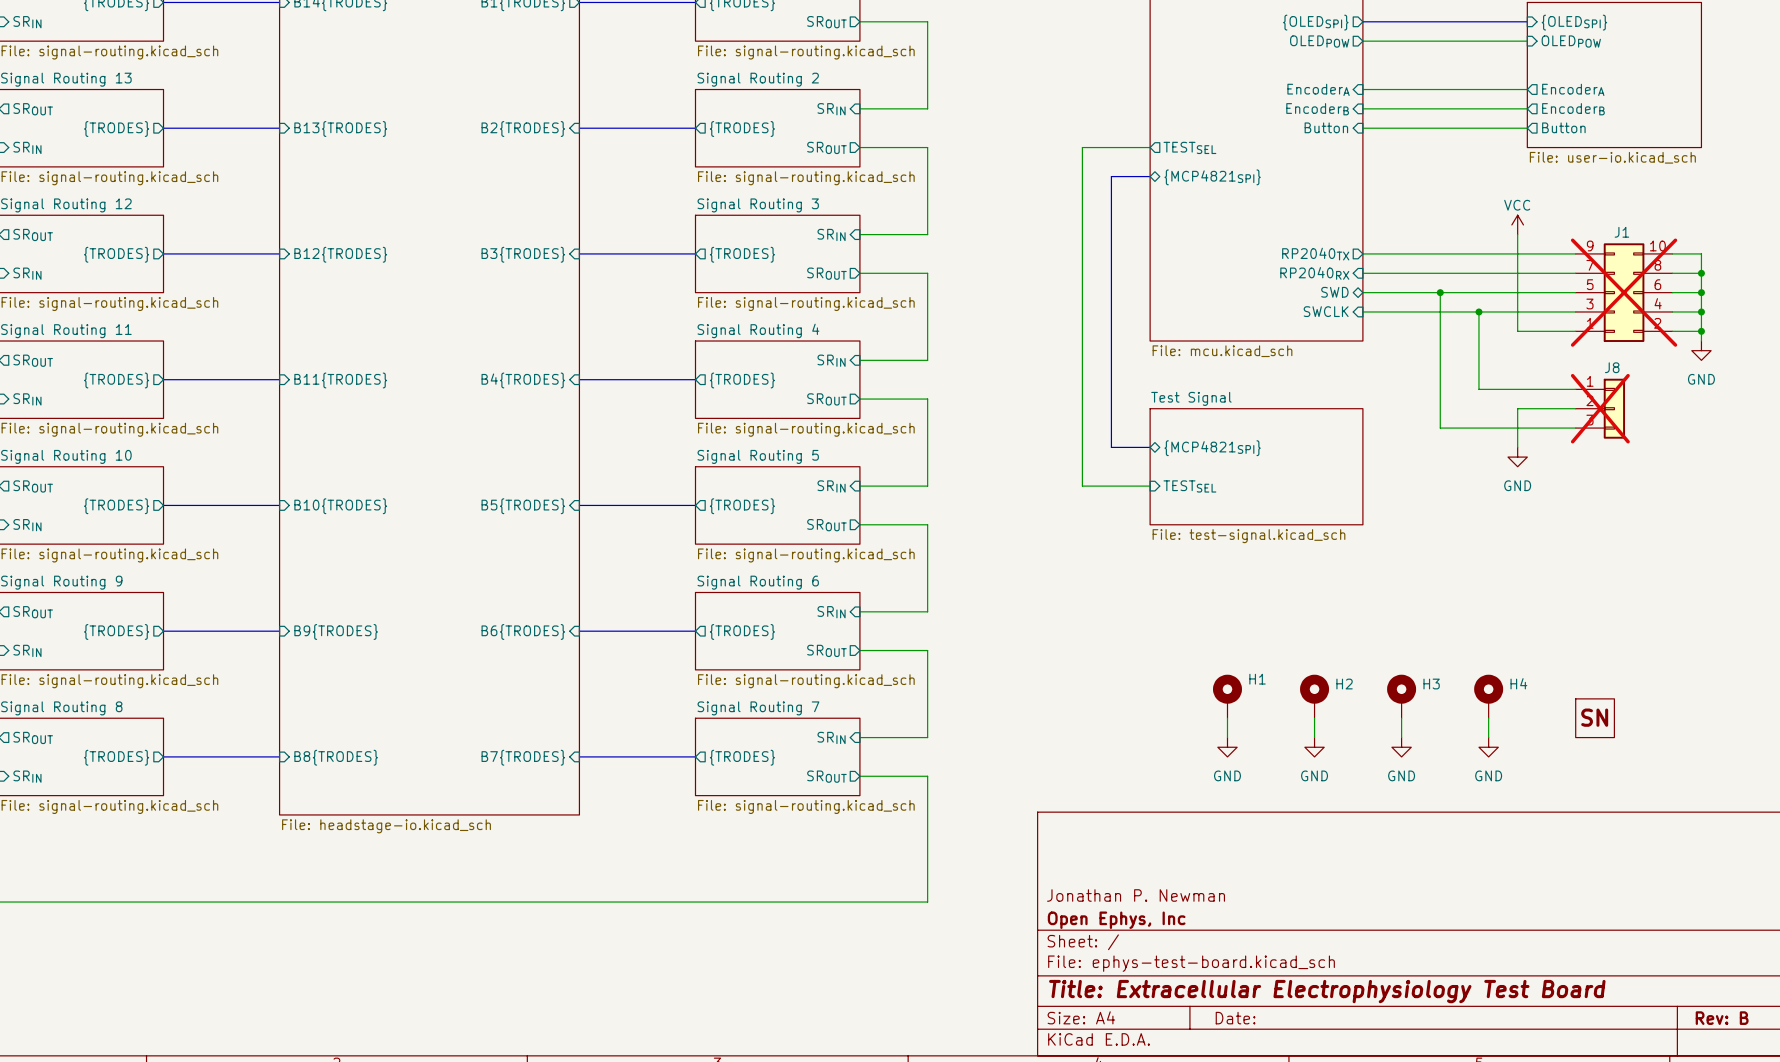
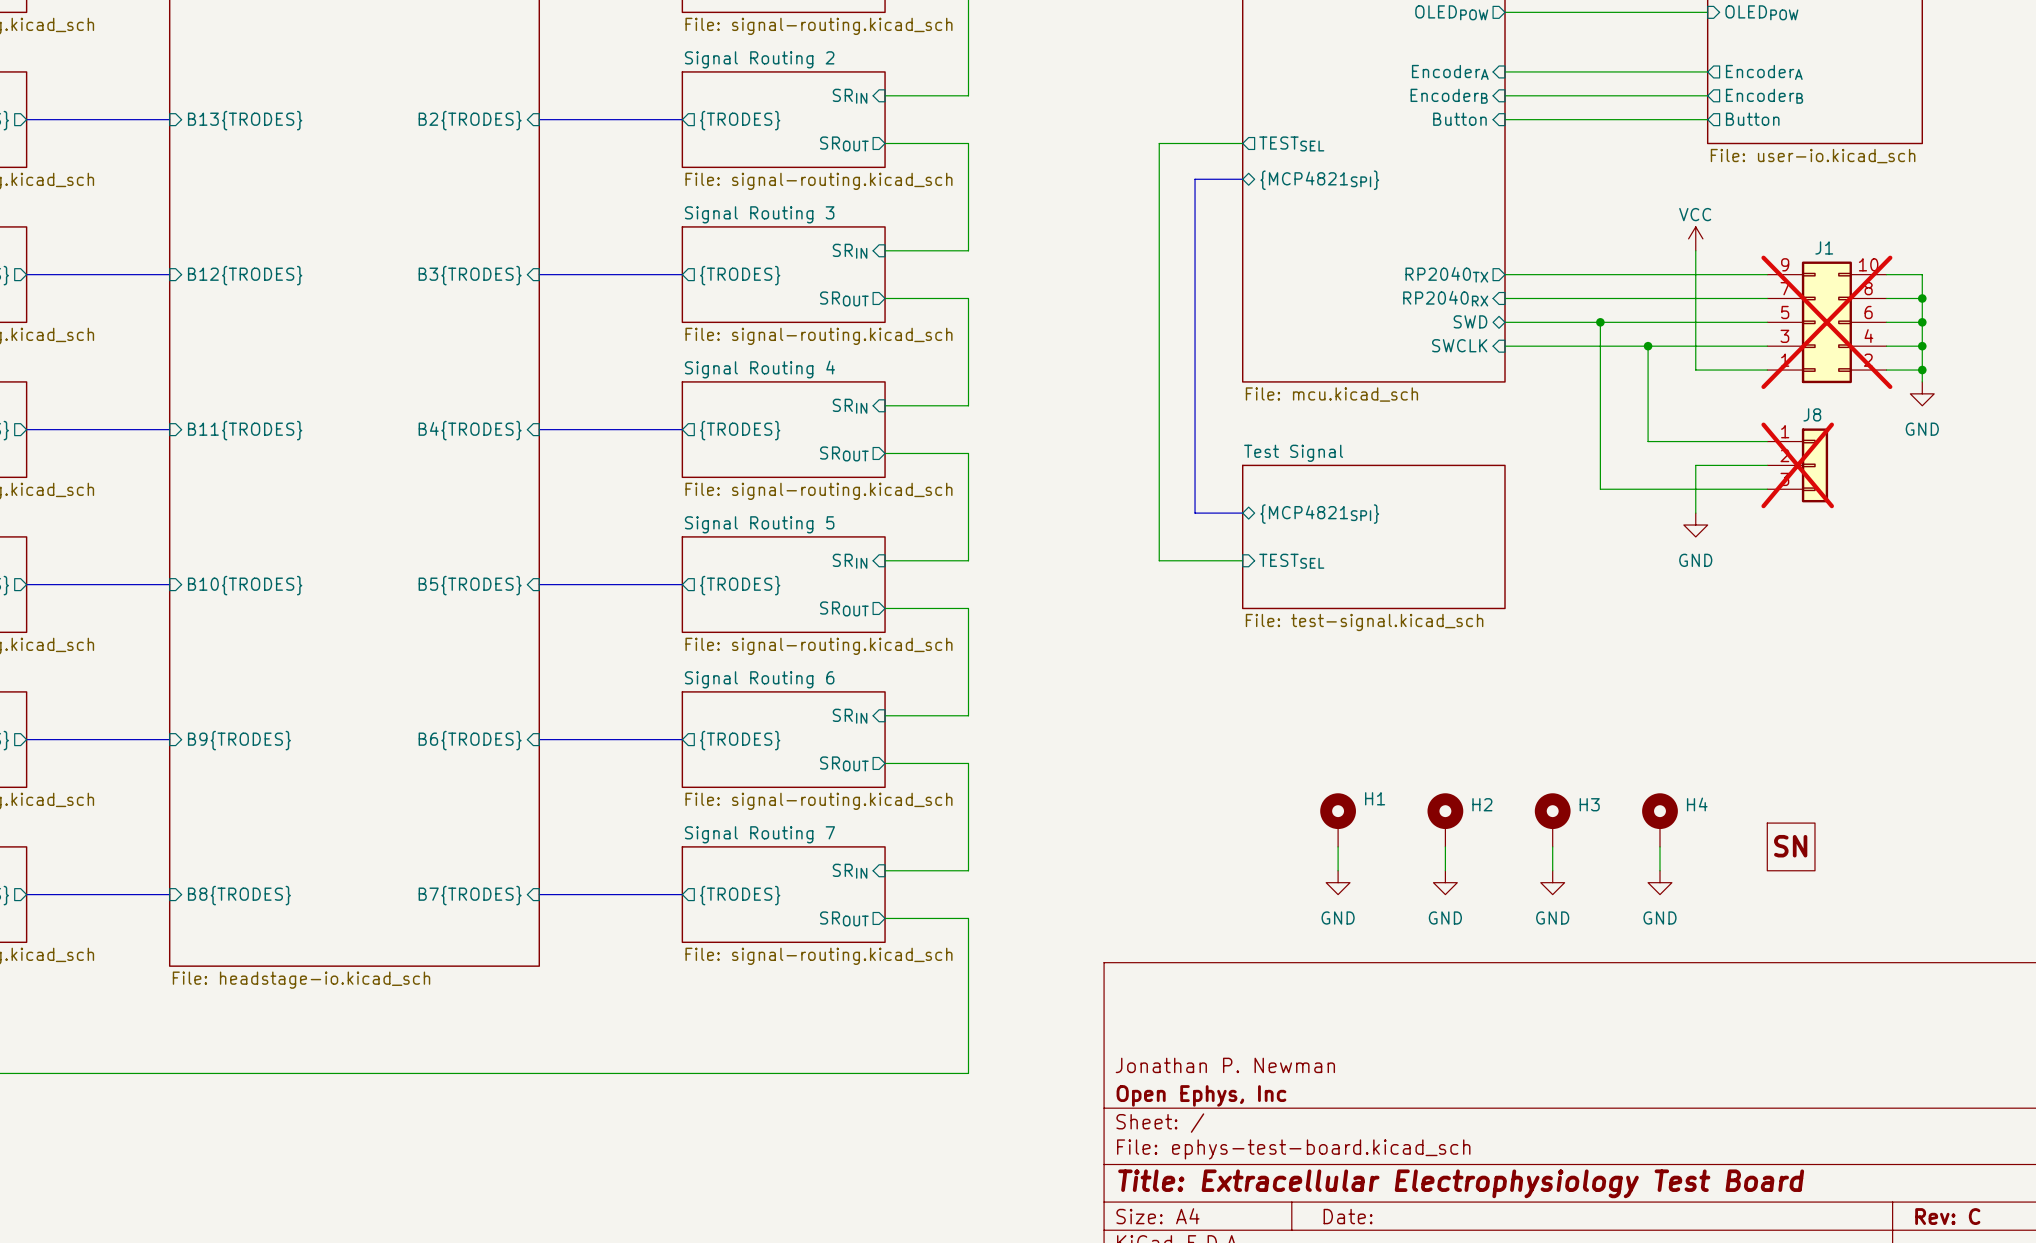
title block: Rev: B (1722, 1018) -> Rev: C (1947, 1216)

